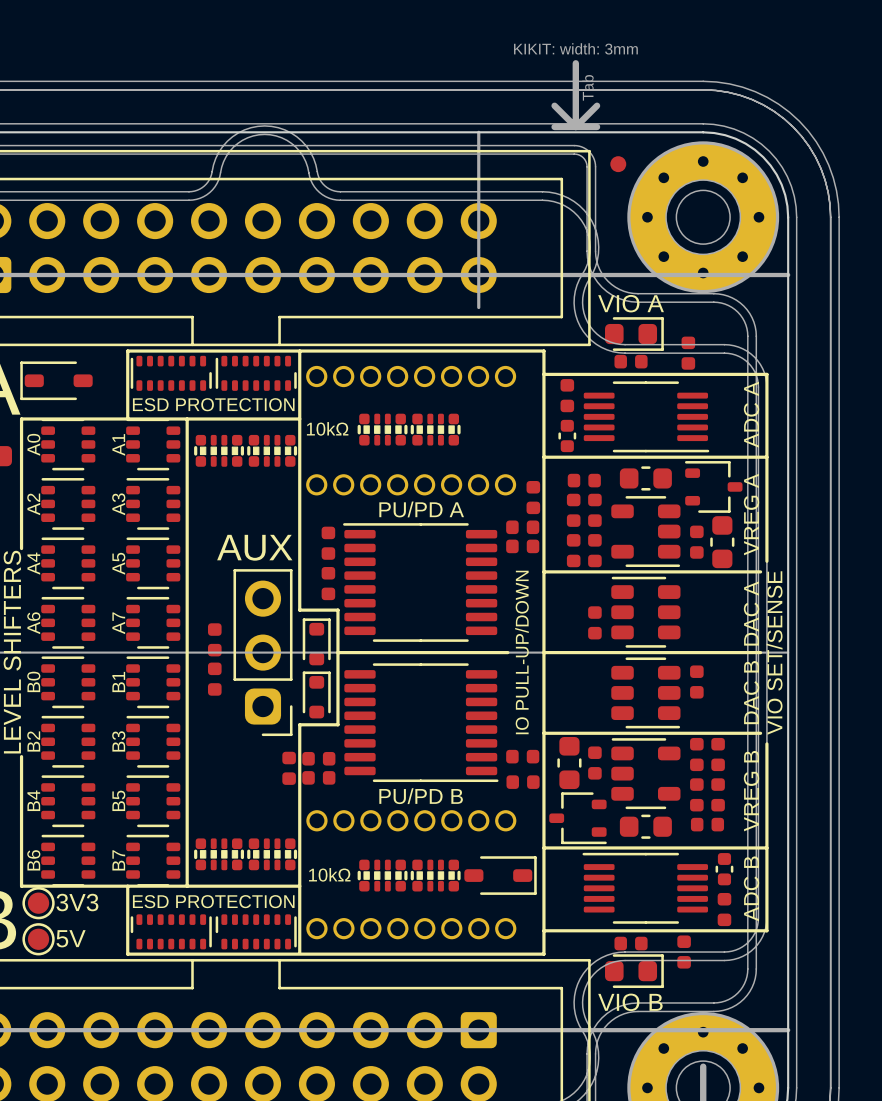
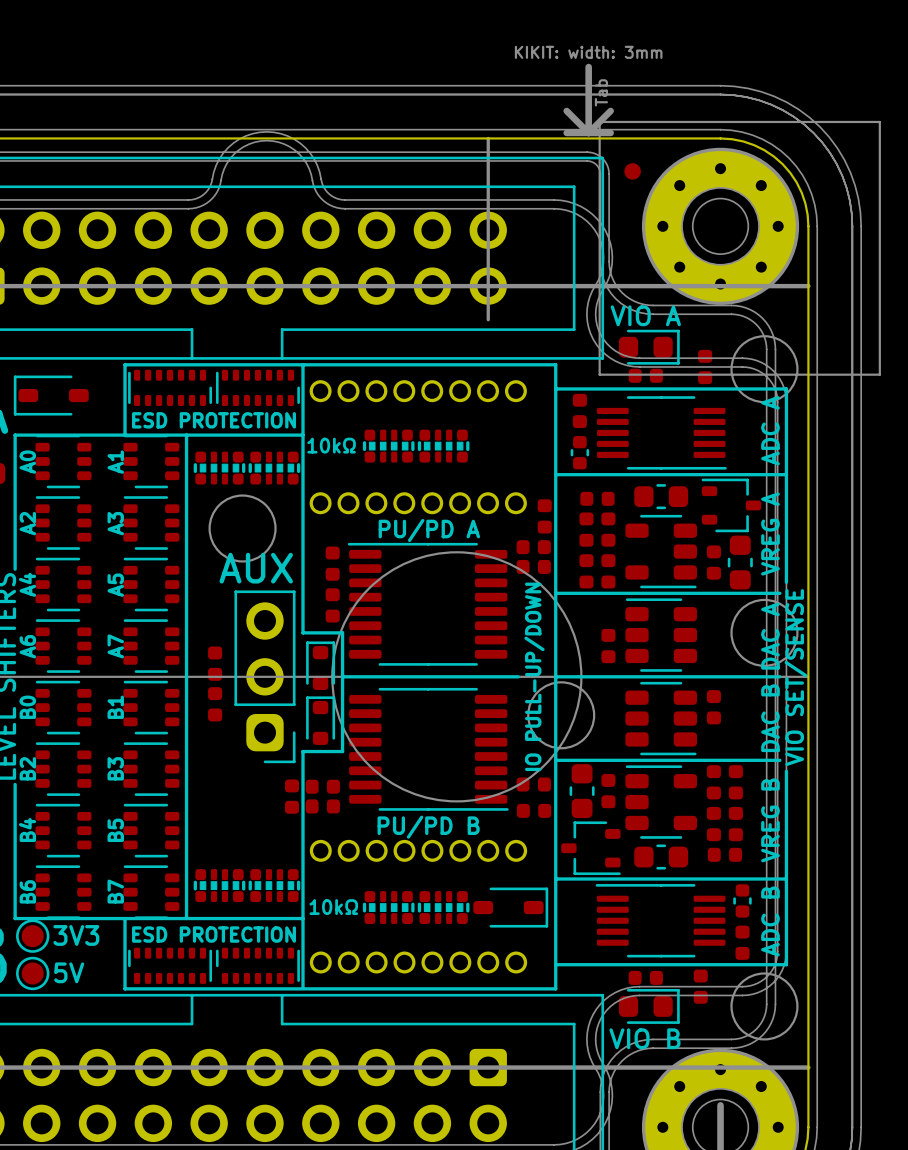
line: none -> (599, 121) (879, 121) (879, 374) (599, 374) (599, 121)
drawing: none -> [730, 335, 799, 404]
drawing: none -> [208, 494, 277, 563]
drawing: none -> [331, 551, 596, 803]
drawing: none -> [730, 598, 799, 667]
drawing: none -> [730, 972, 799, 1041]

